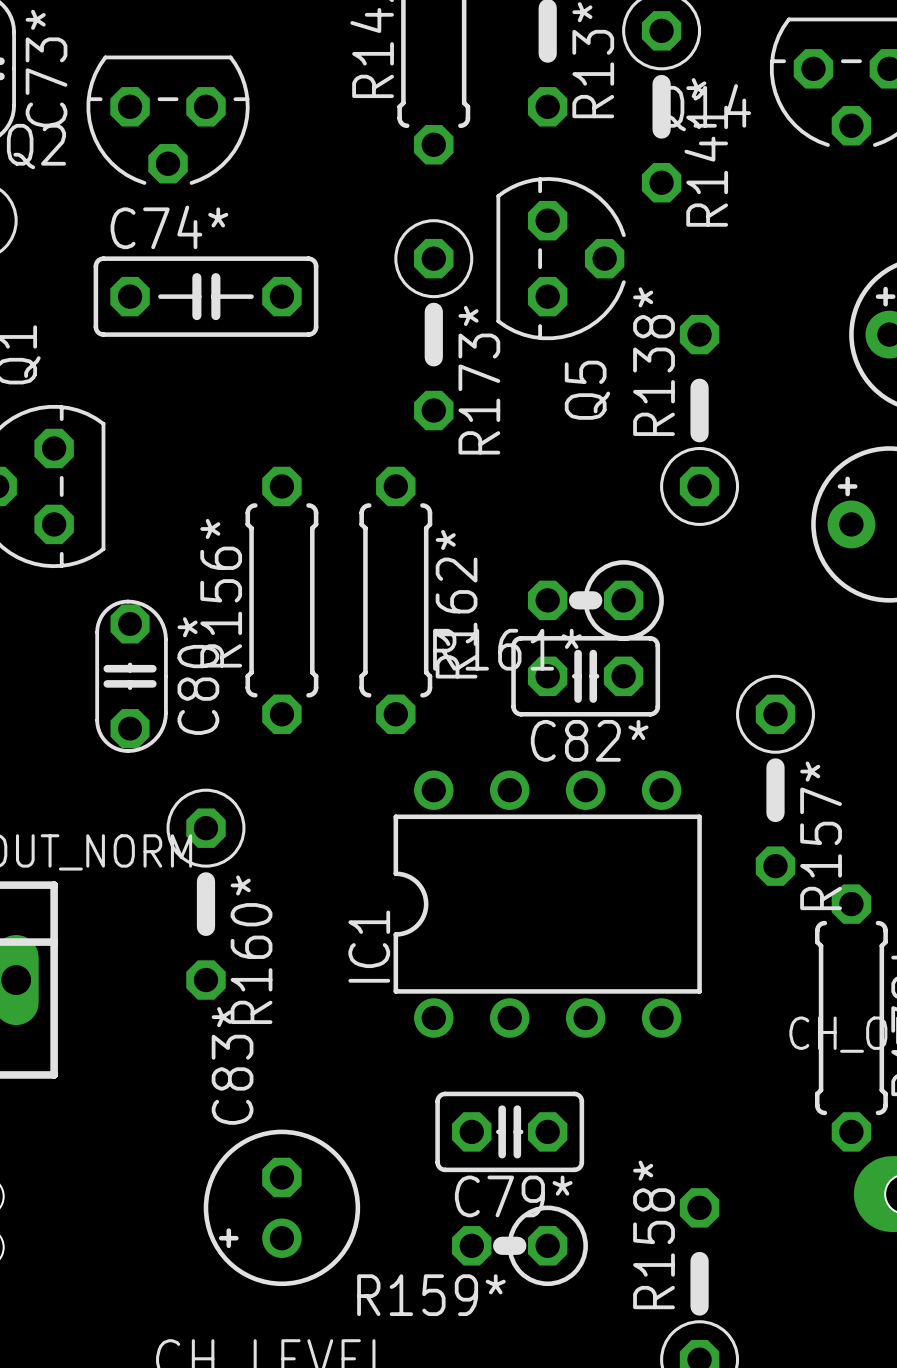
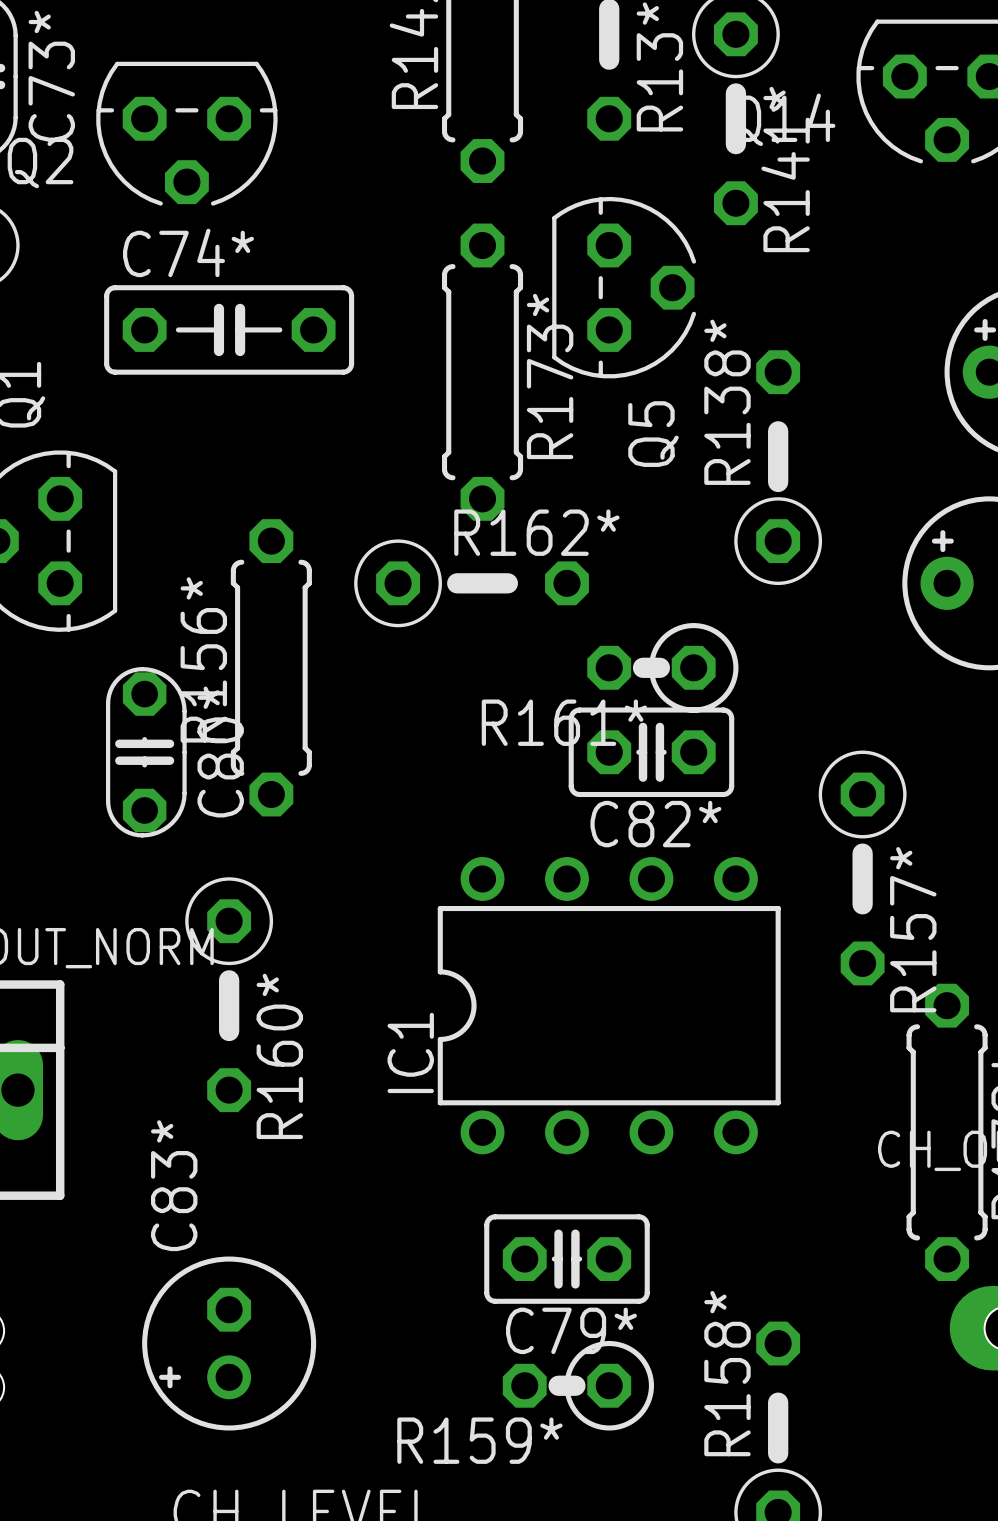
R173* footprint: [394, 219, 474, 431] -> [441, 223, 524, 521]
R162* footprint: [359, 466, 433, 735] -> [354, 539, 589, 628]
R156* position: (281, 600) -> (271, 667)
R162* name position: R162* (456, 604) -> R162* (536, 532)
C83* position: (281, 1207) -> (229, 1343)

